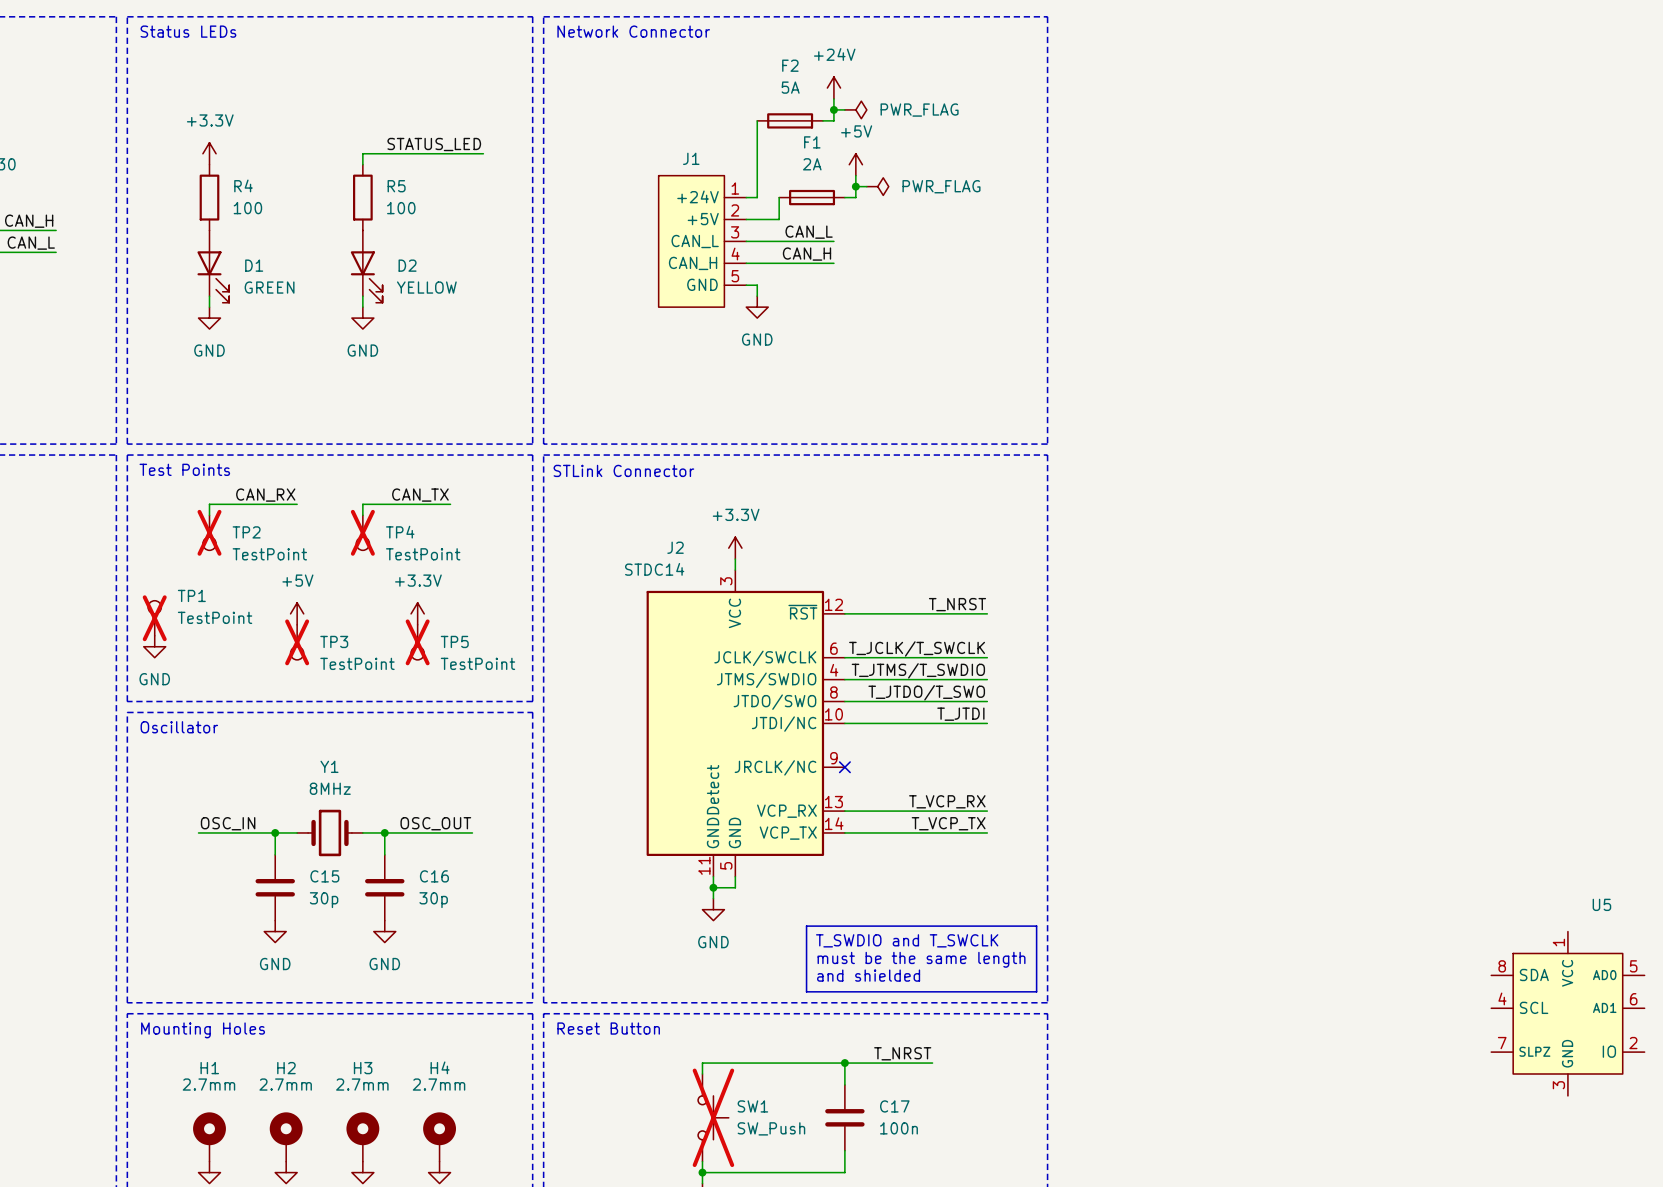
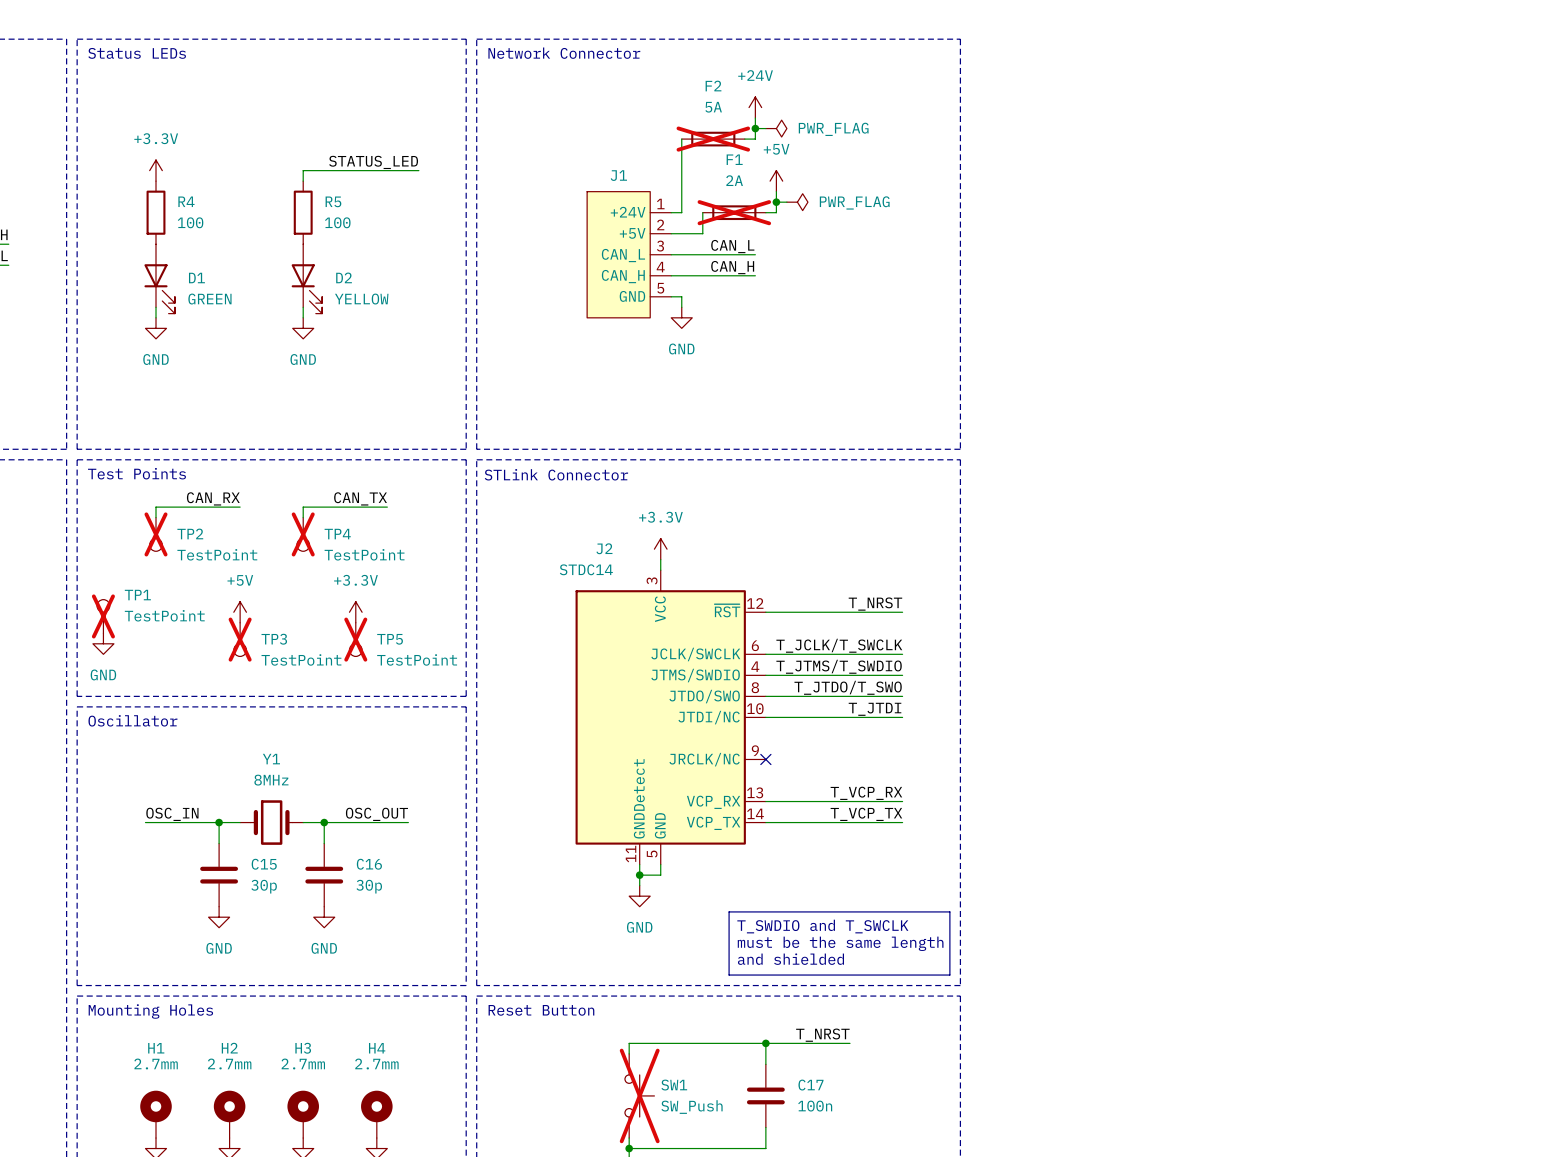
F2 do-not-place cross: none -> (713, 139)
F1 do-not-place cross: none -> (734, 212)
U5: (1567, 1013) -> none

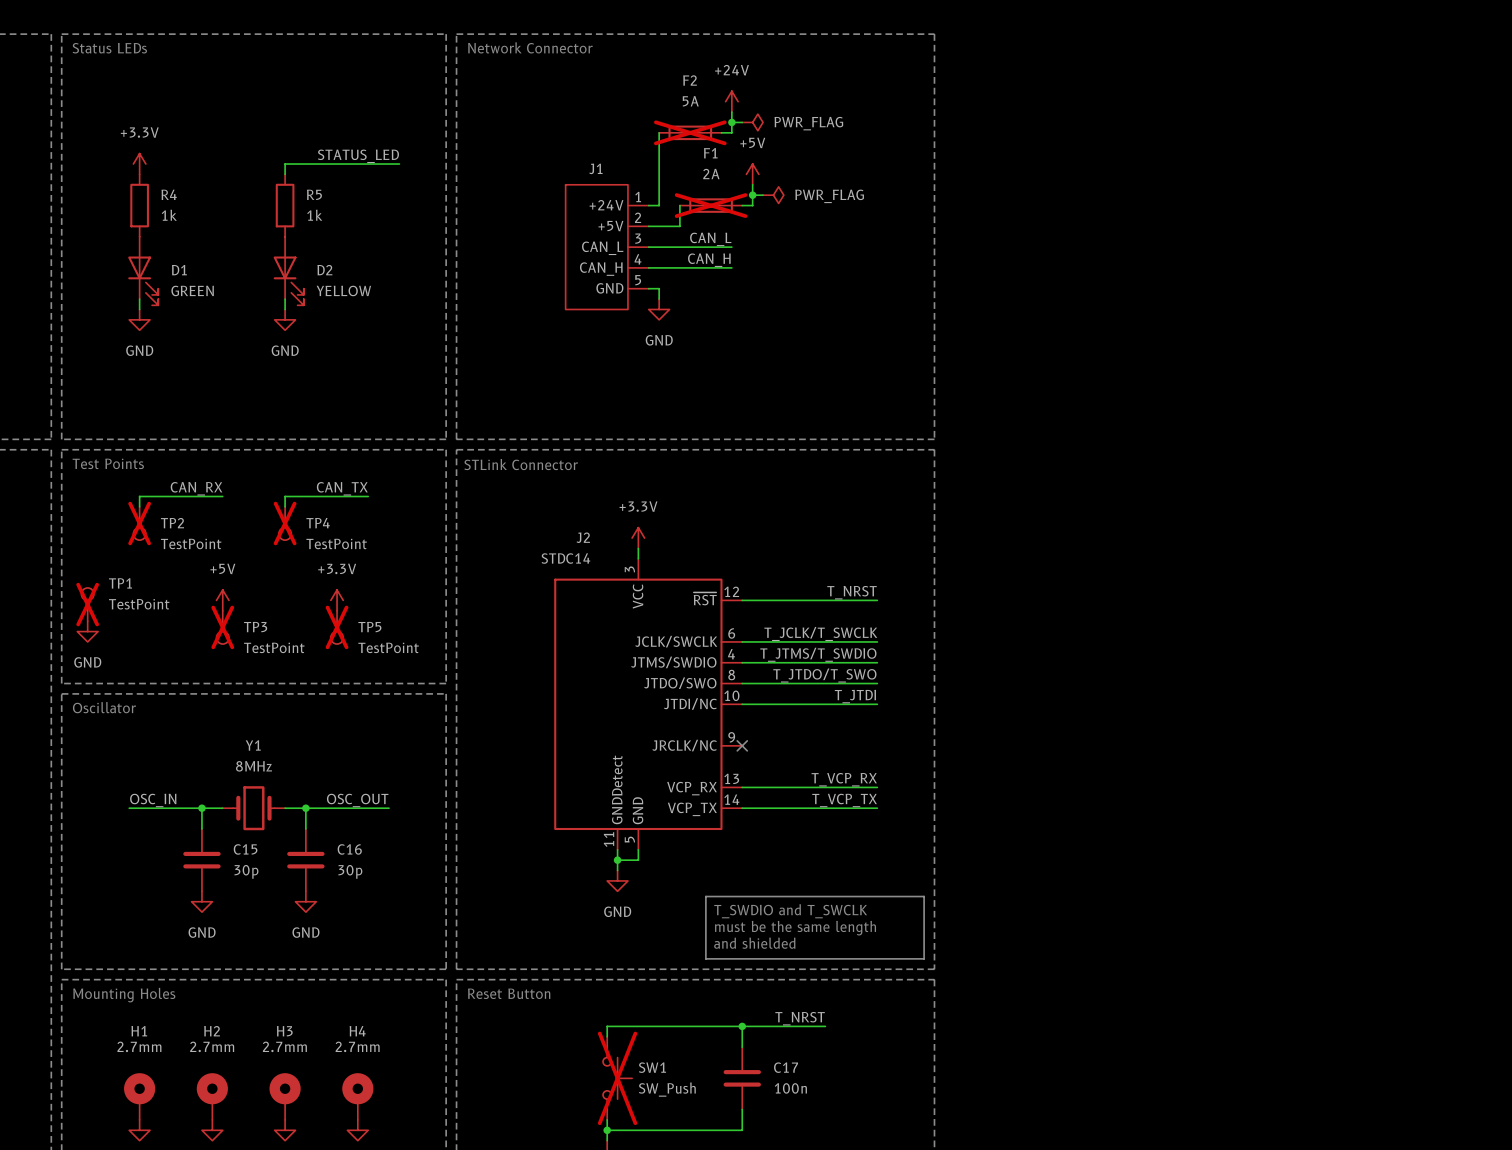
R4 value: 100 (190, 222) -> 1k (169, 215)
R5 value: 100 (337, 222) -> 1k (314, 215)

